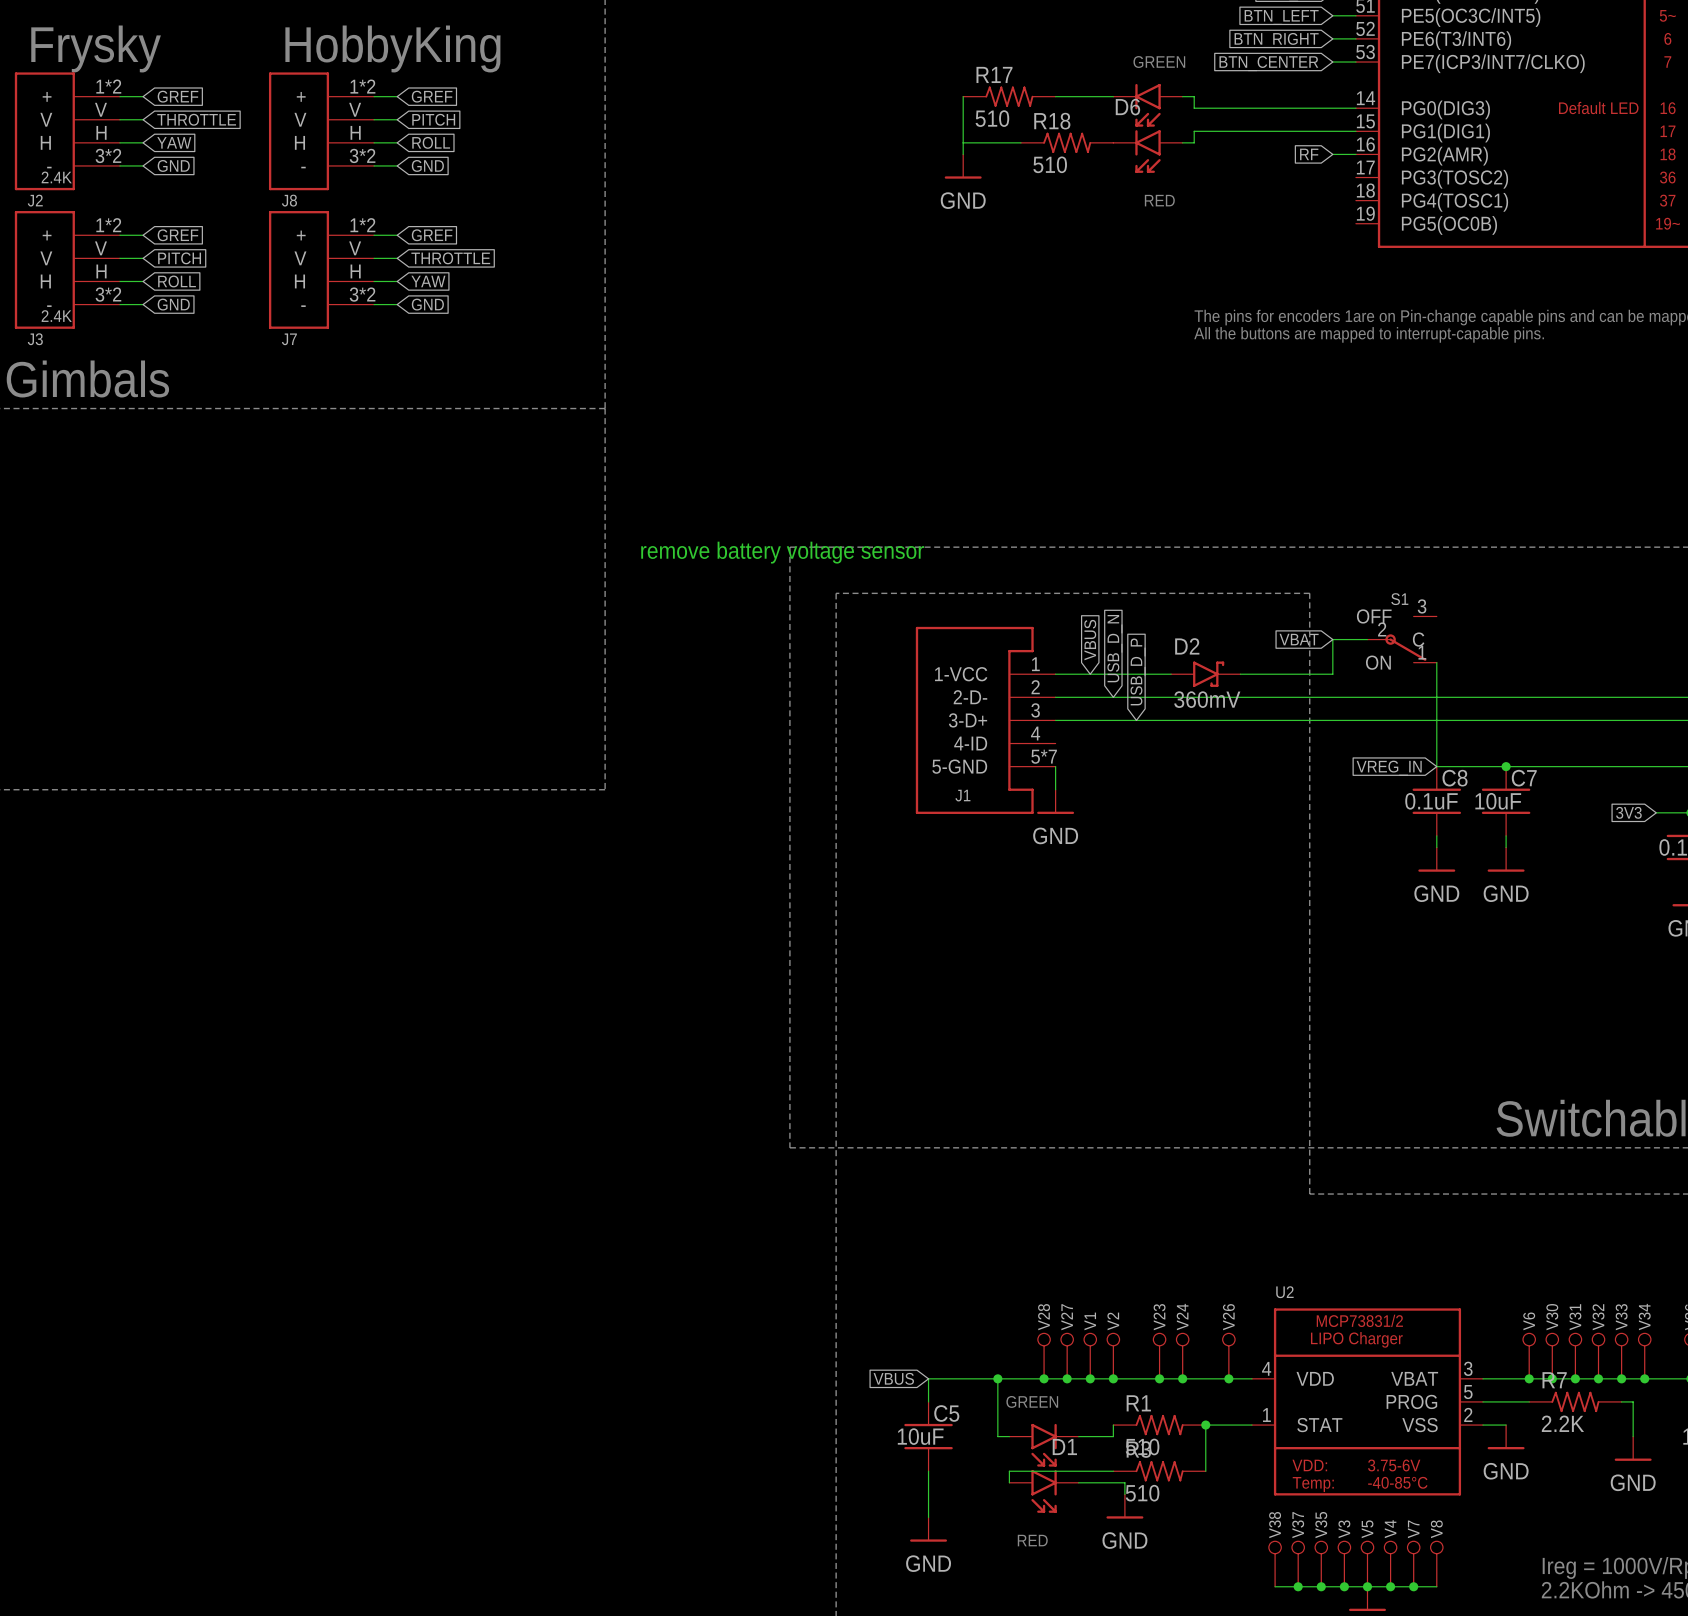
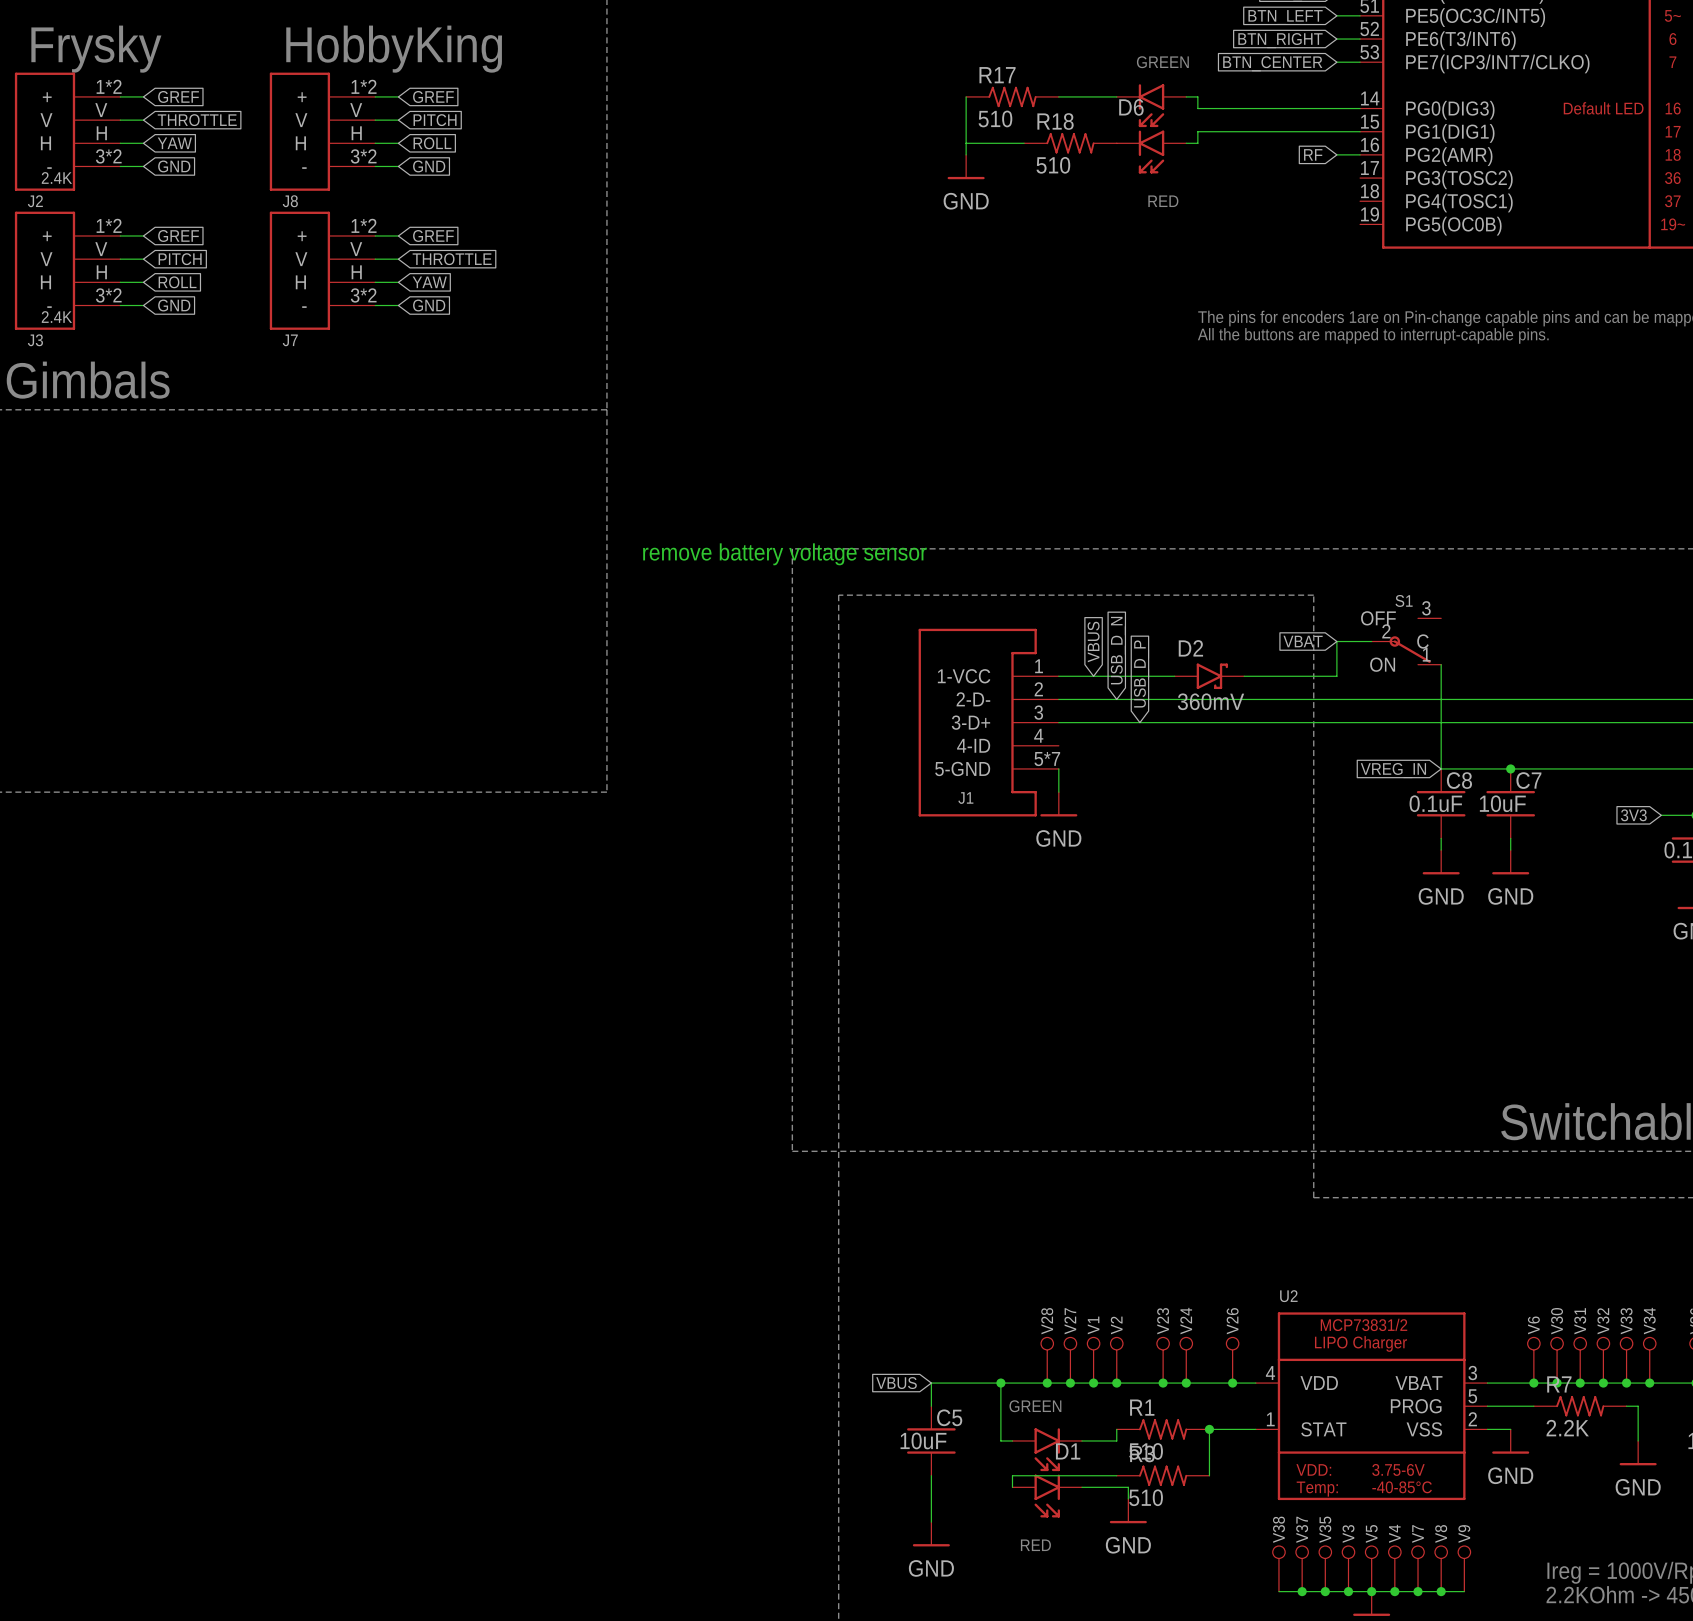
V9: none -> (1464, 1568)
wire: none -> (1441, 1591) (1464, 1591)
junction: none -> (1441, 1591)

